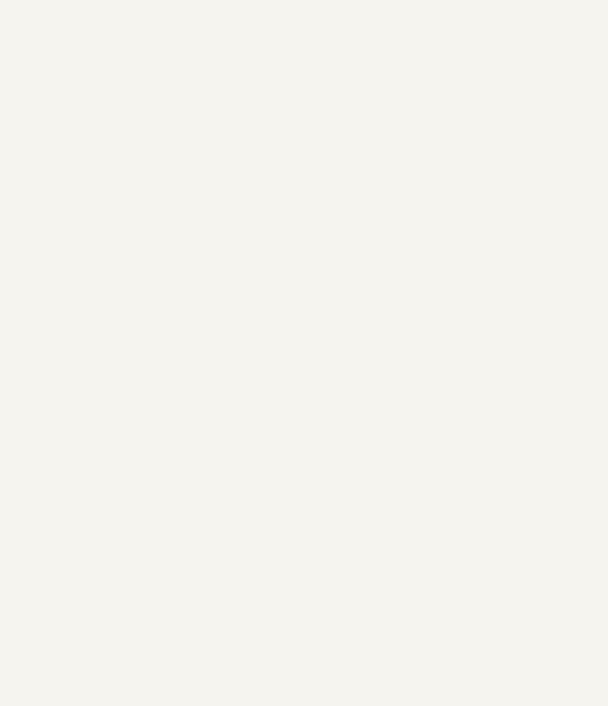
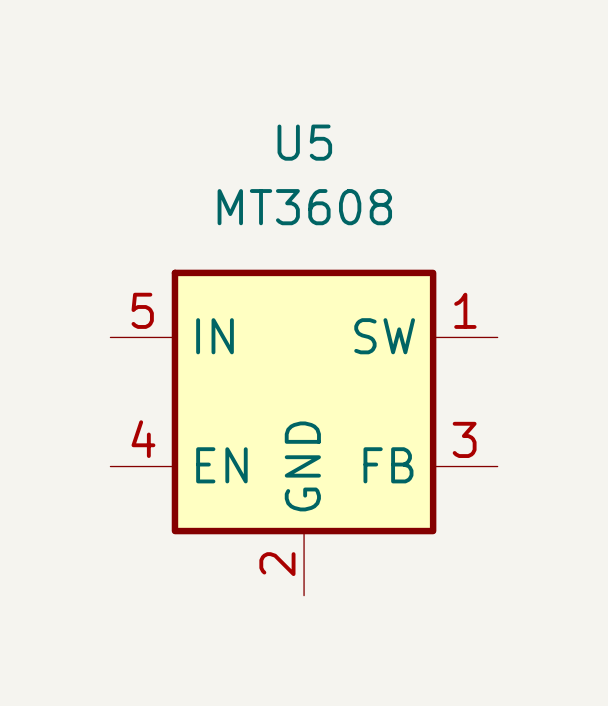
U5: none -> MT3608 (304, 432)

